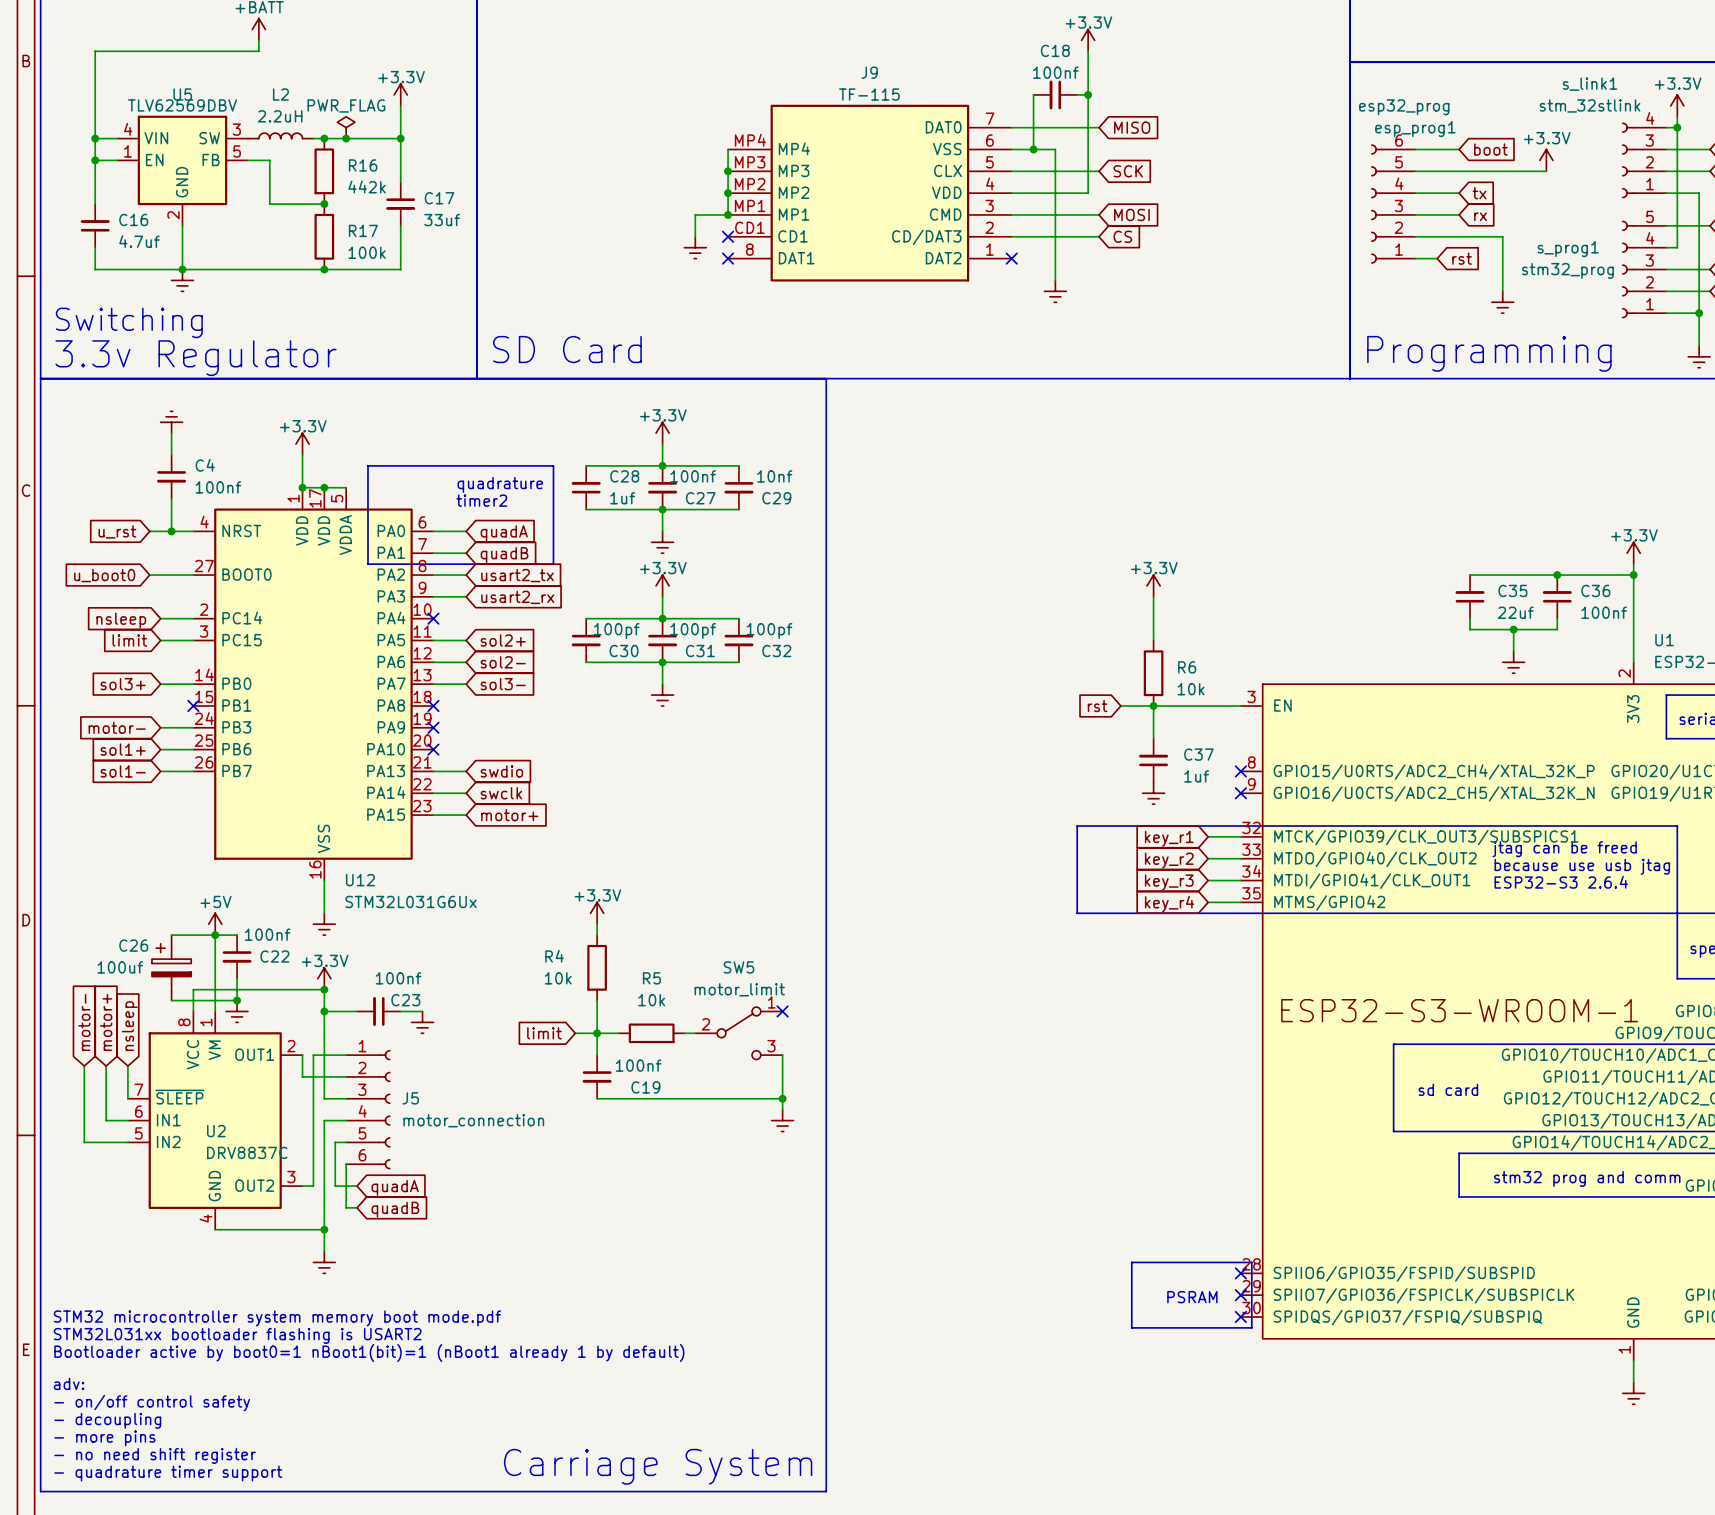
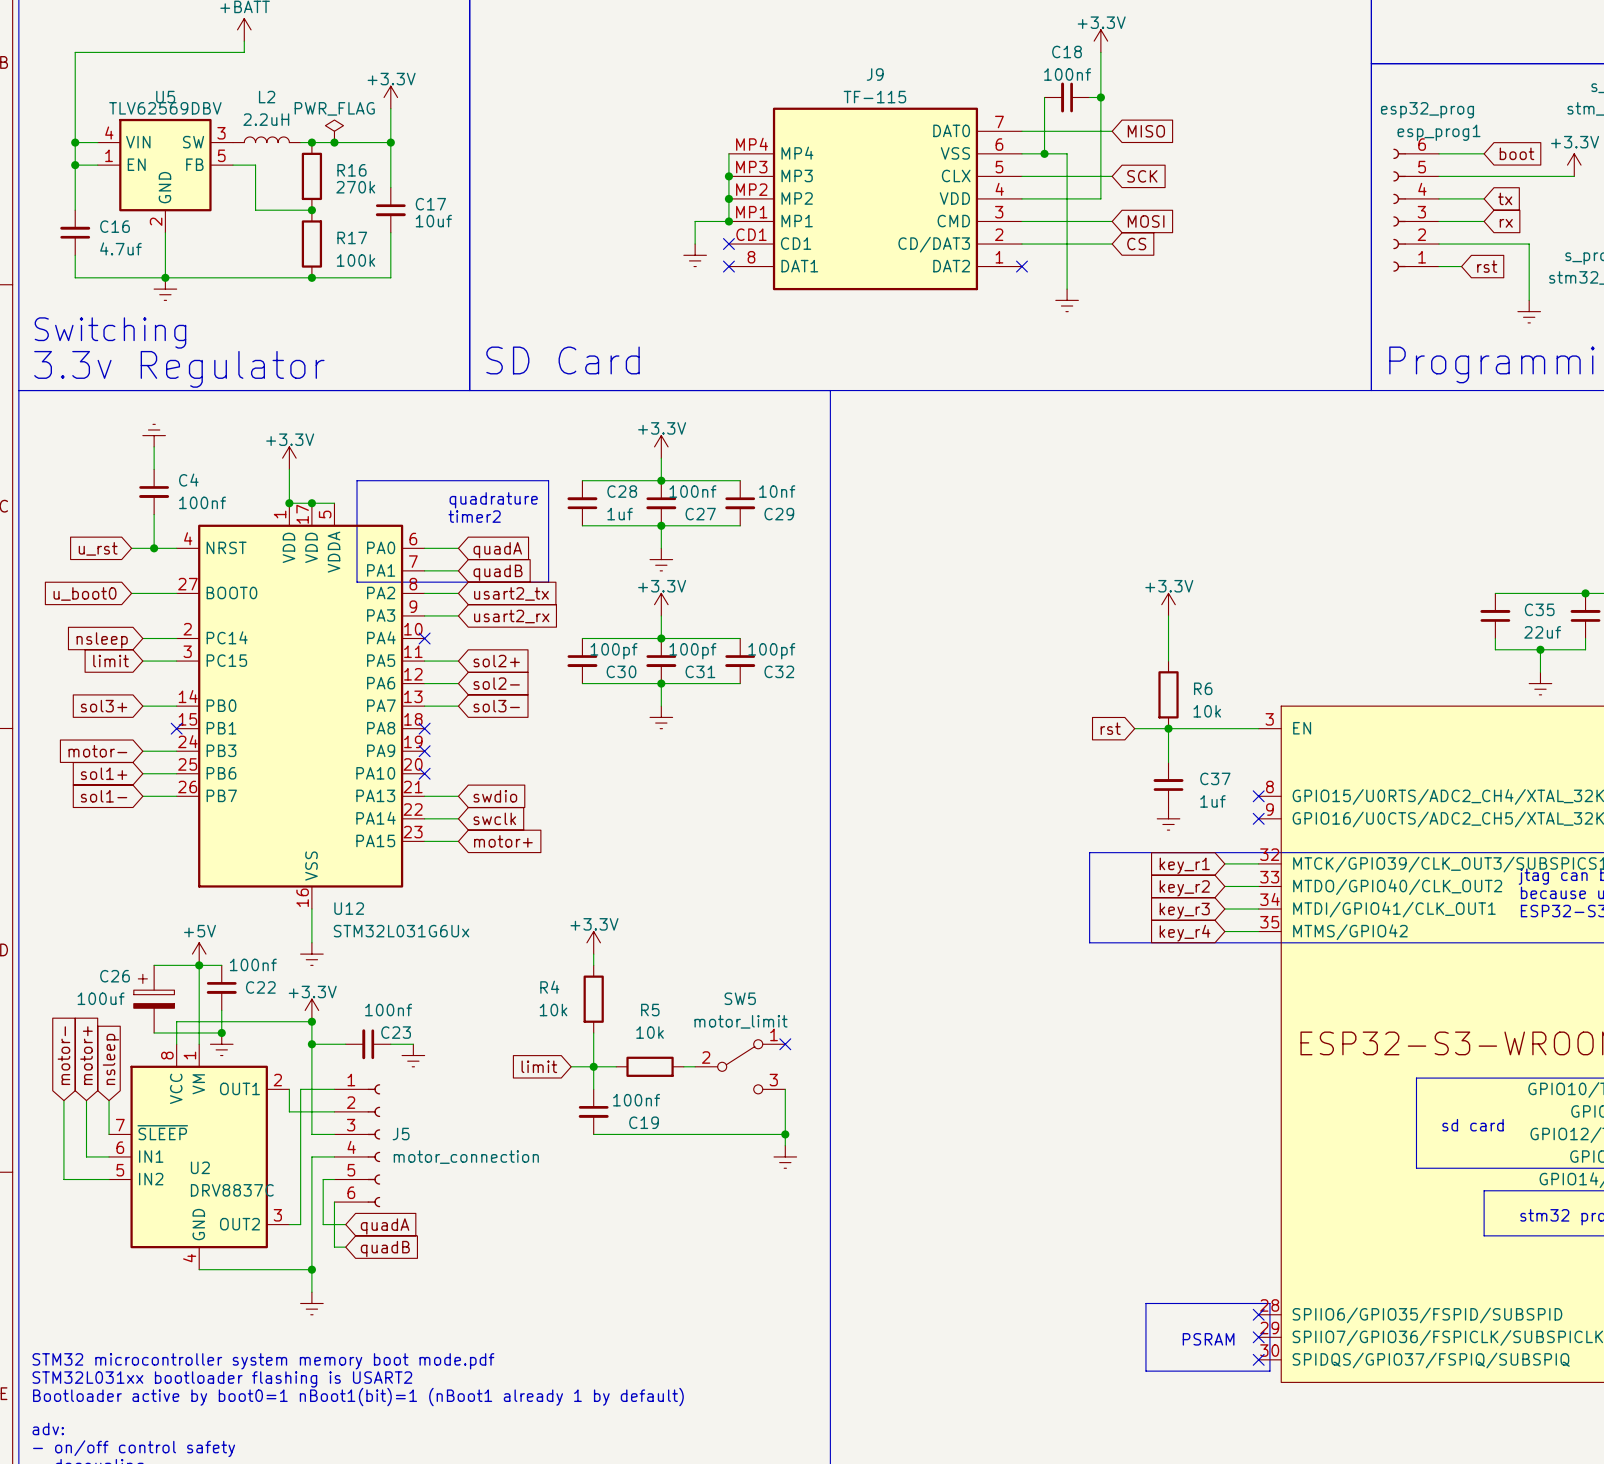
R16 value: 442k (367, 187) -> 270k (355, 187)
C17 value: 33uf (442, 220) -> 10uf (433, 221)

